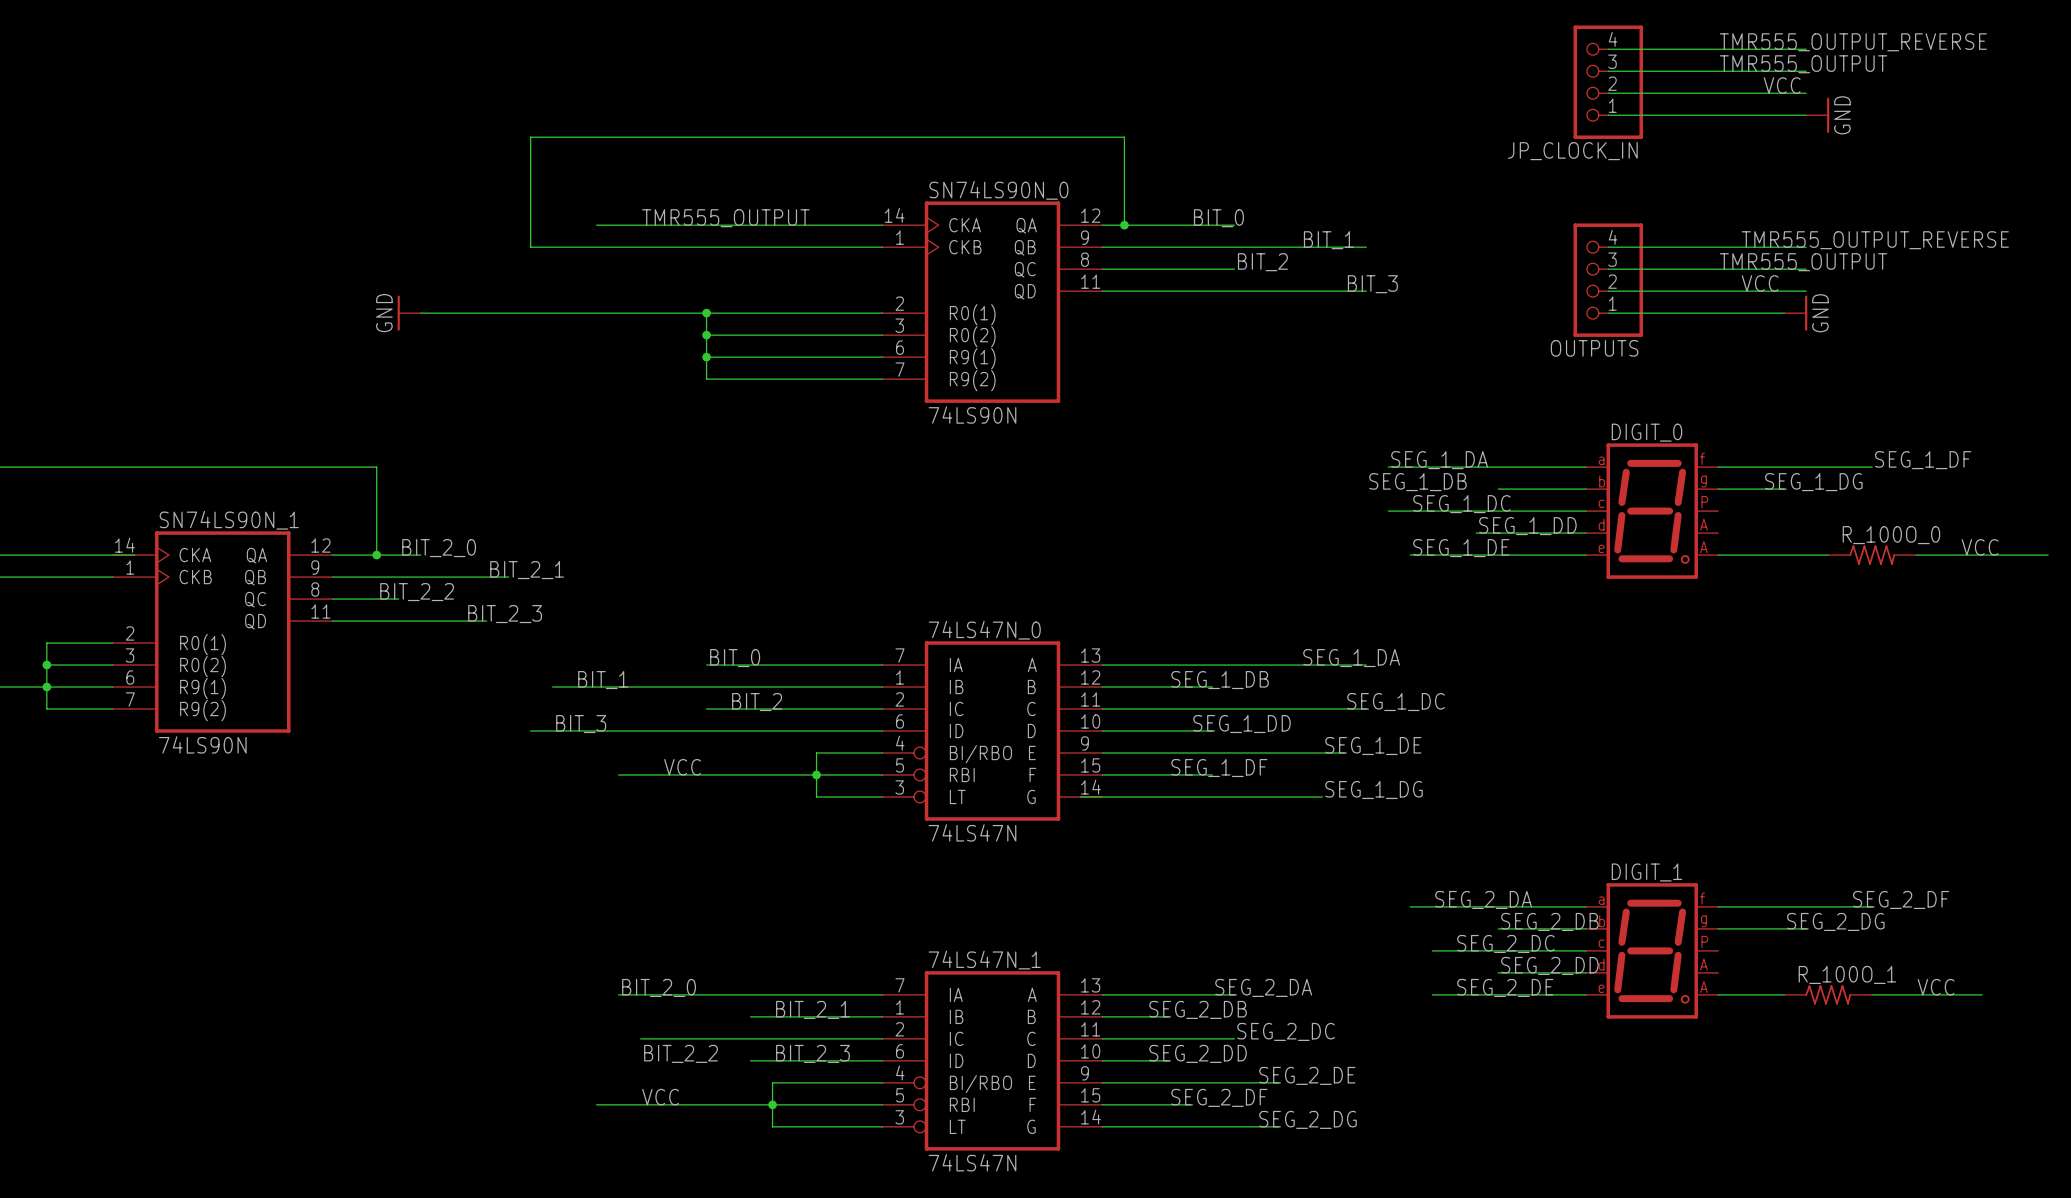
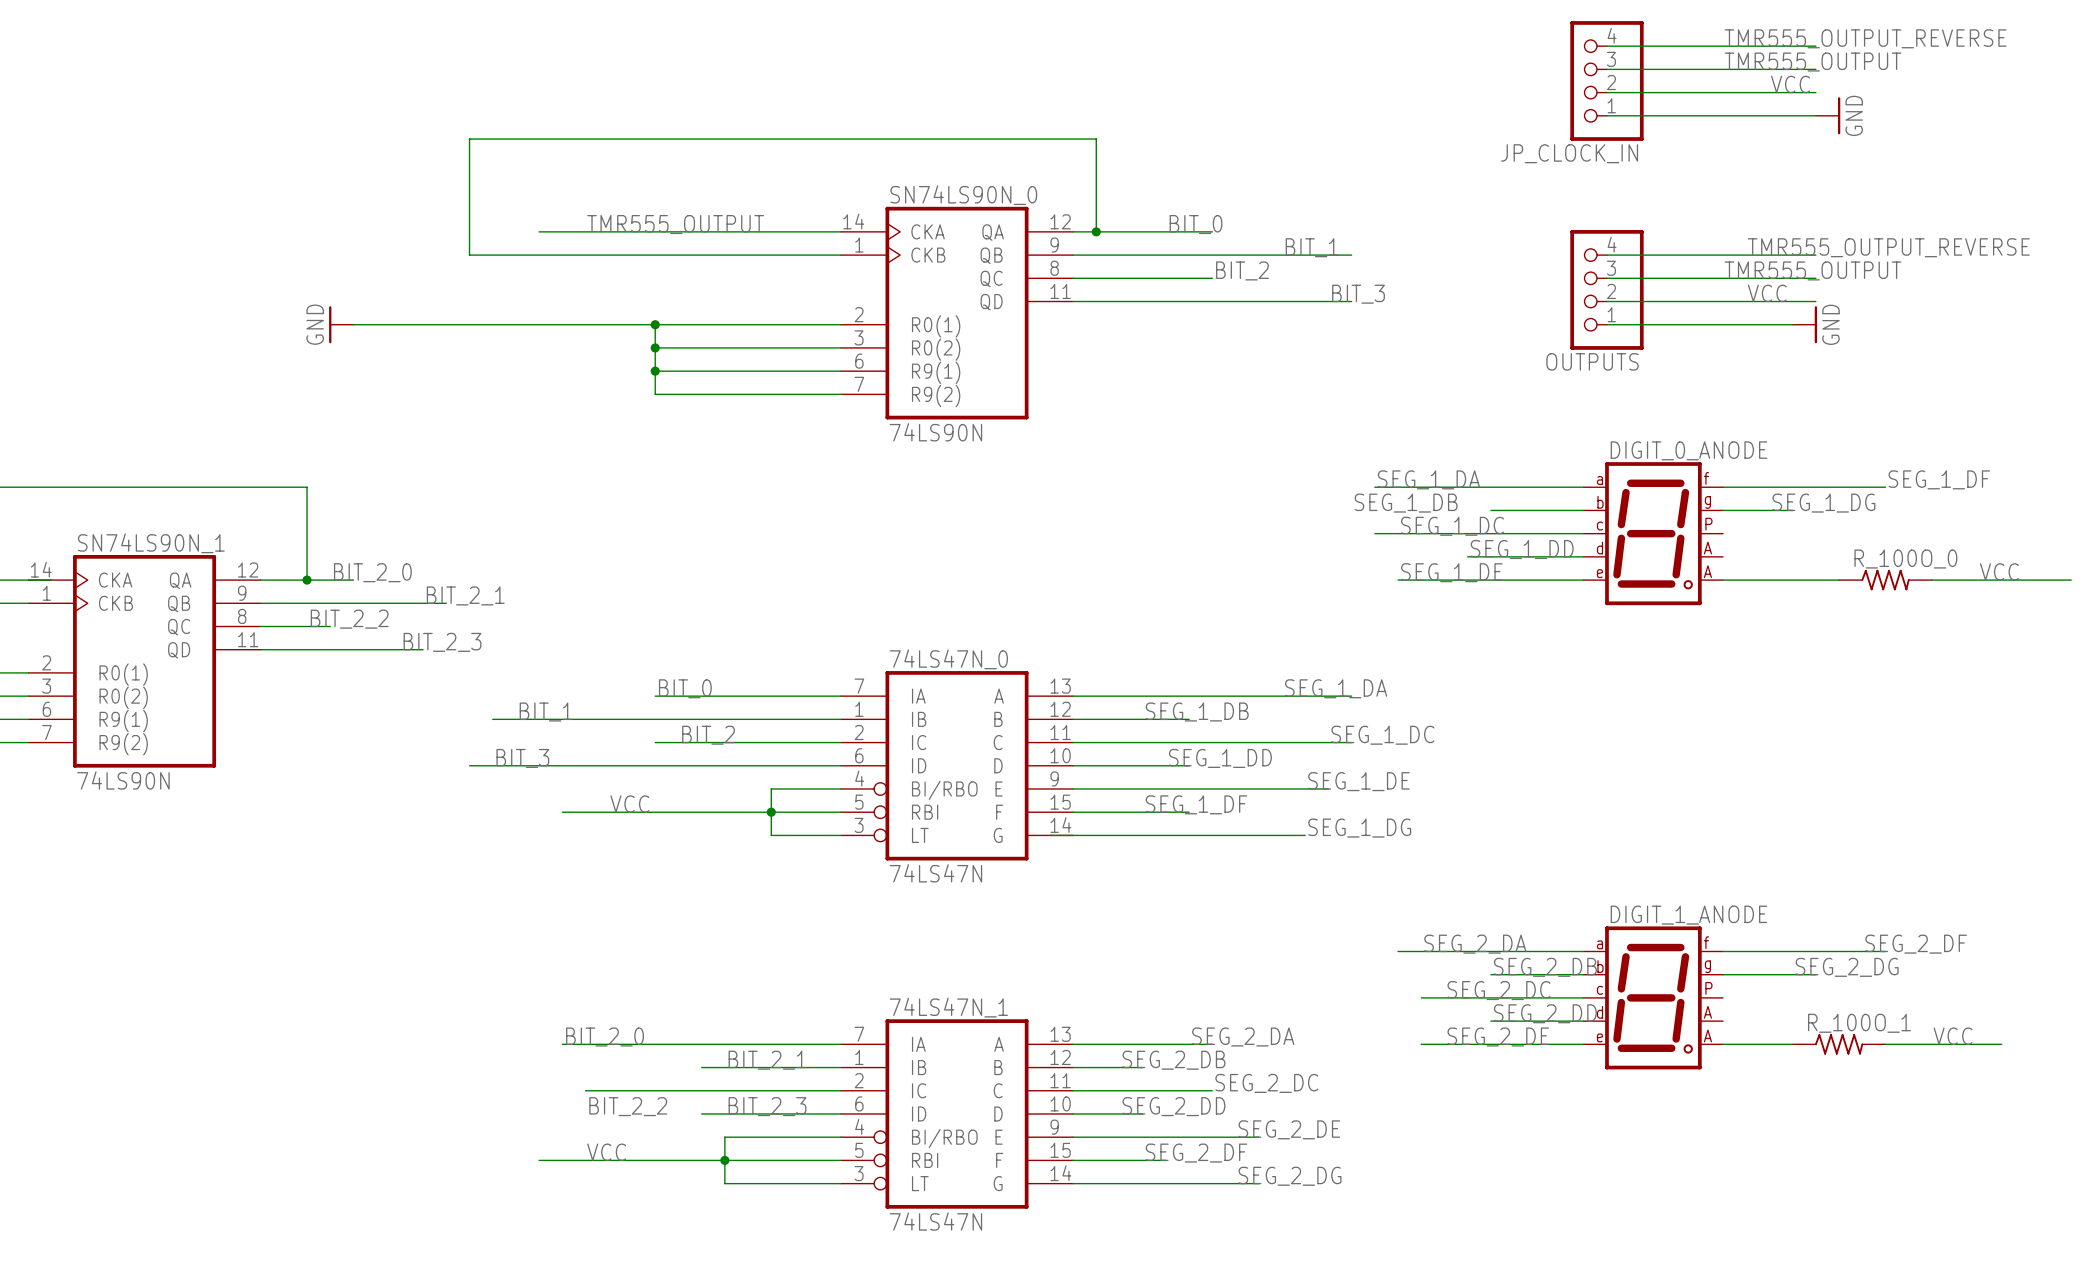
DIGIT_0 name: DIGIT_0 (1647, 432) -> DIGIT_0_ANODE (1688, 450)
DIGIT_1 name: DIGIT_1 (1647, 872) -> DIGIT_1_ANODE (1688, 915)

